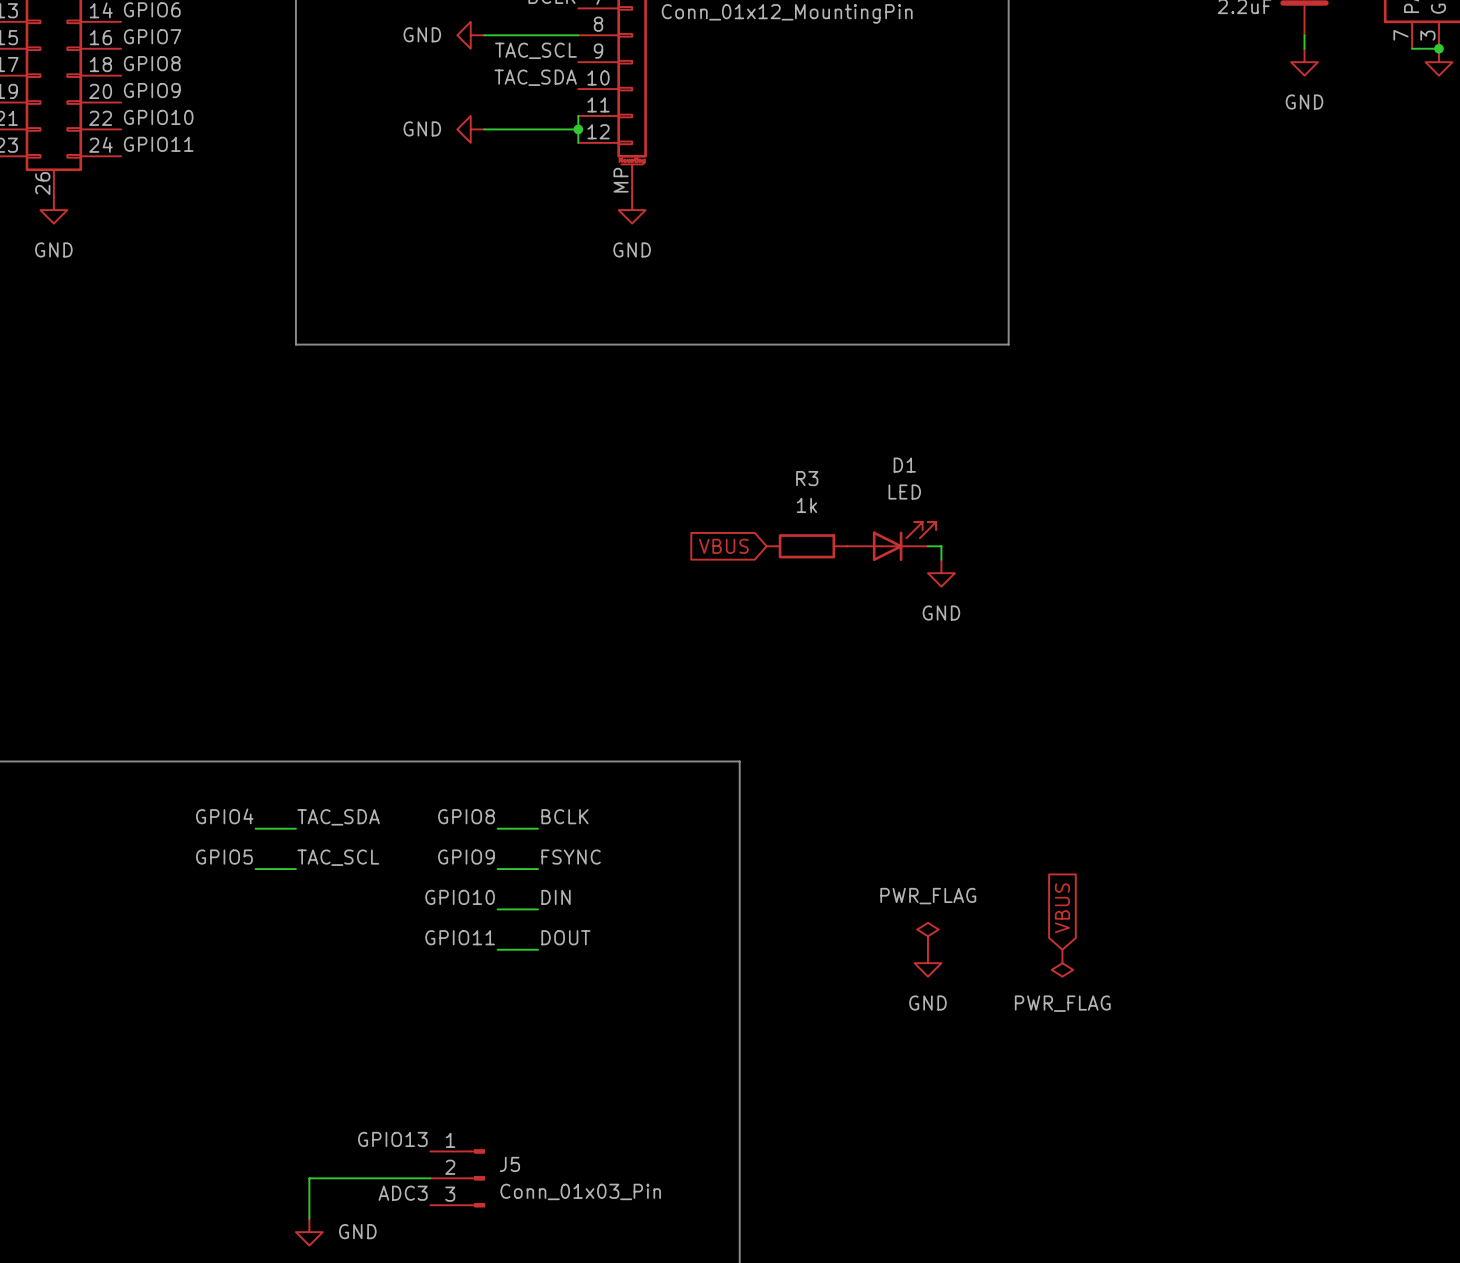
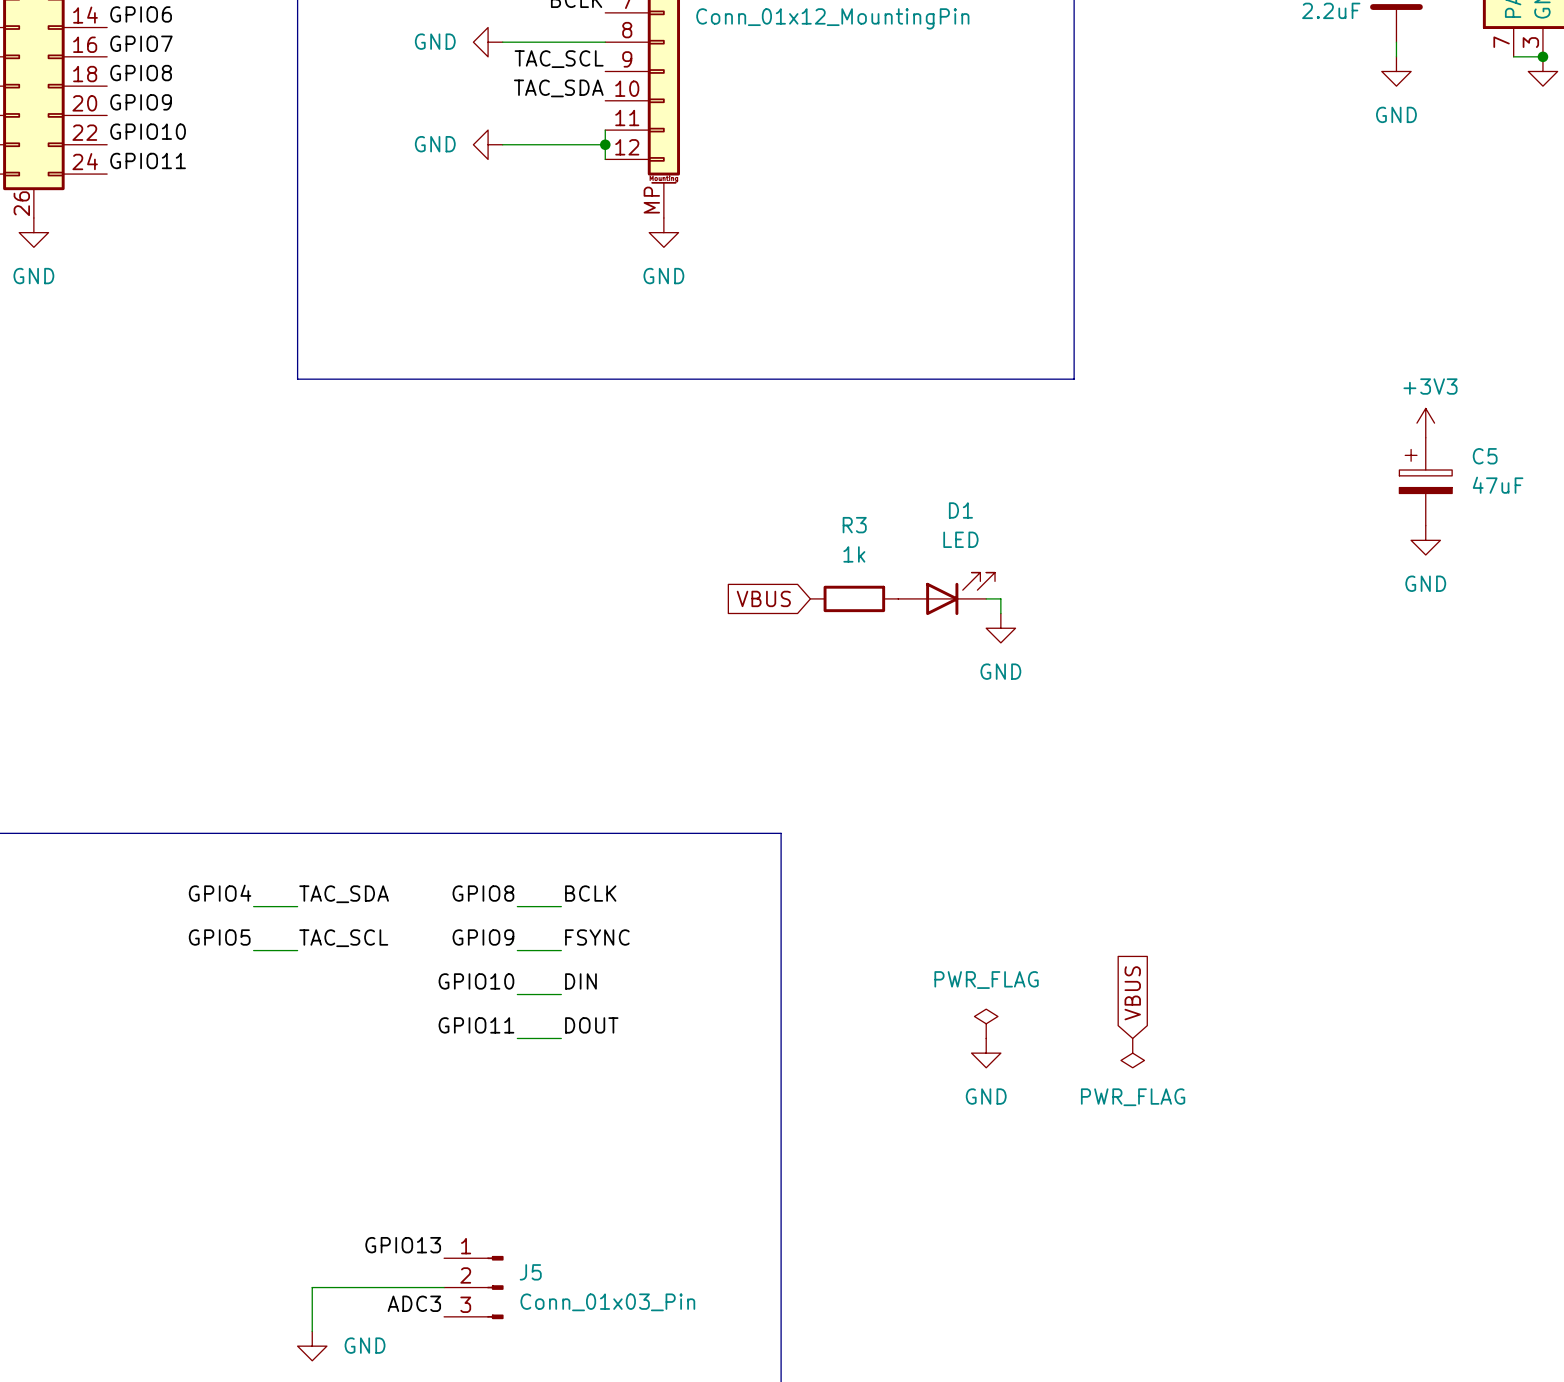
power symbol: none -> +3V3 (1425, 423)
C5: none -> 47uF (1425, 481)
power symbol: none -> GND (1425, 540)

